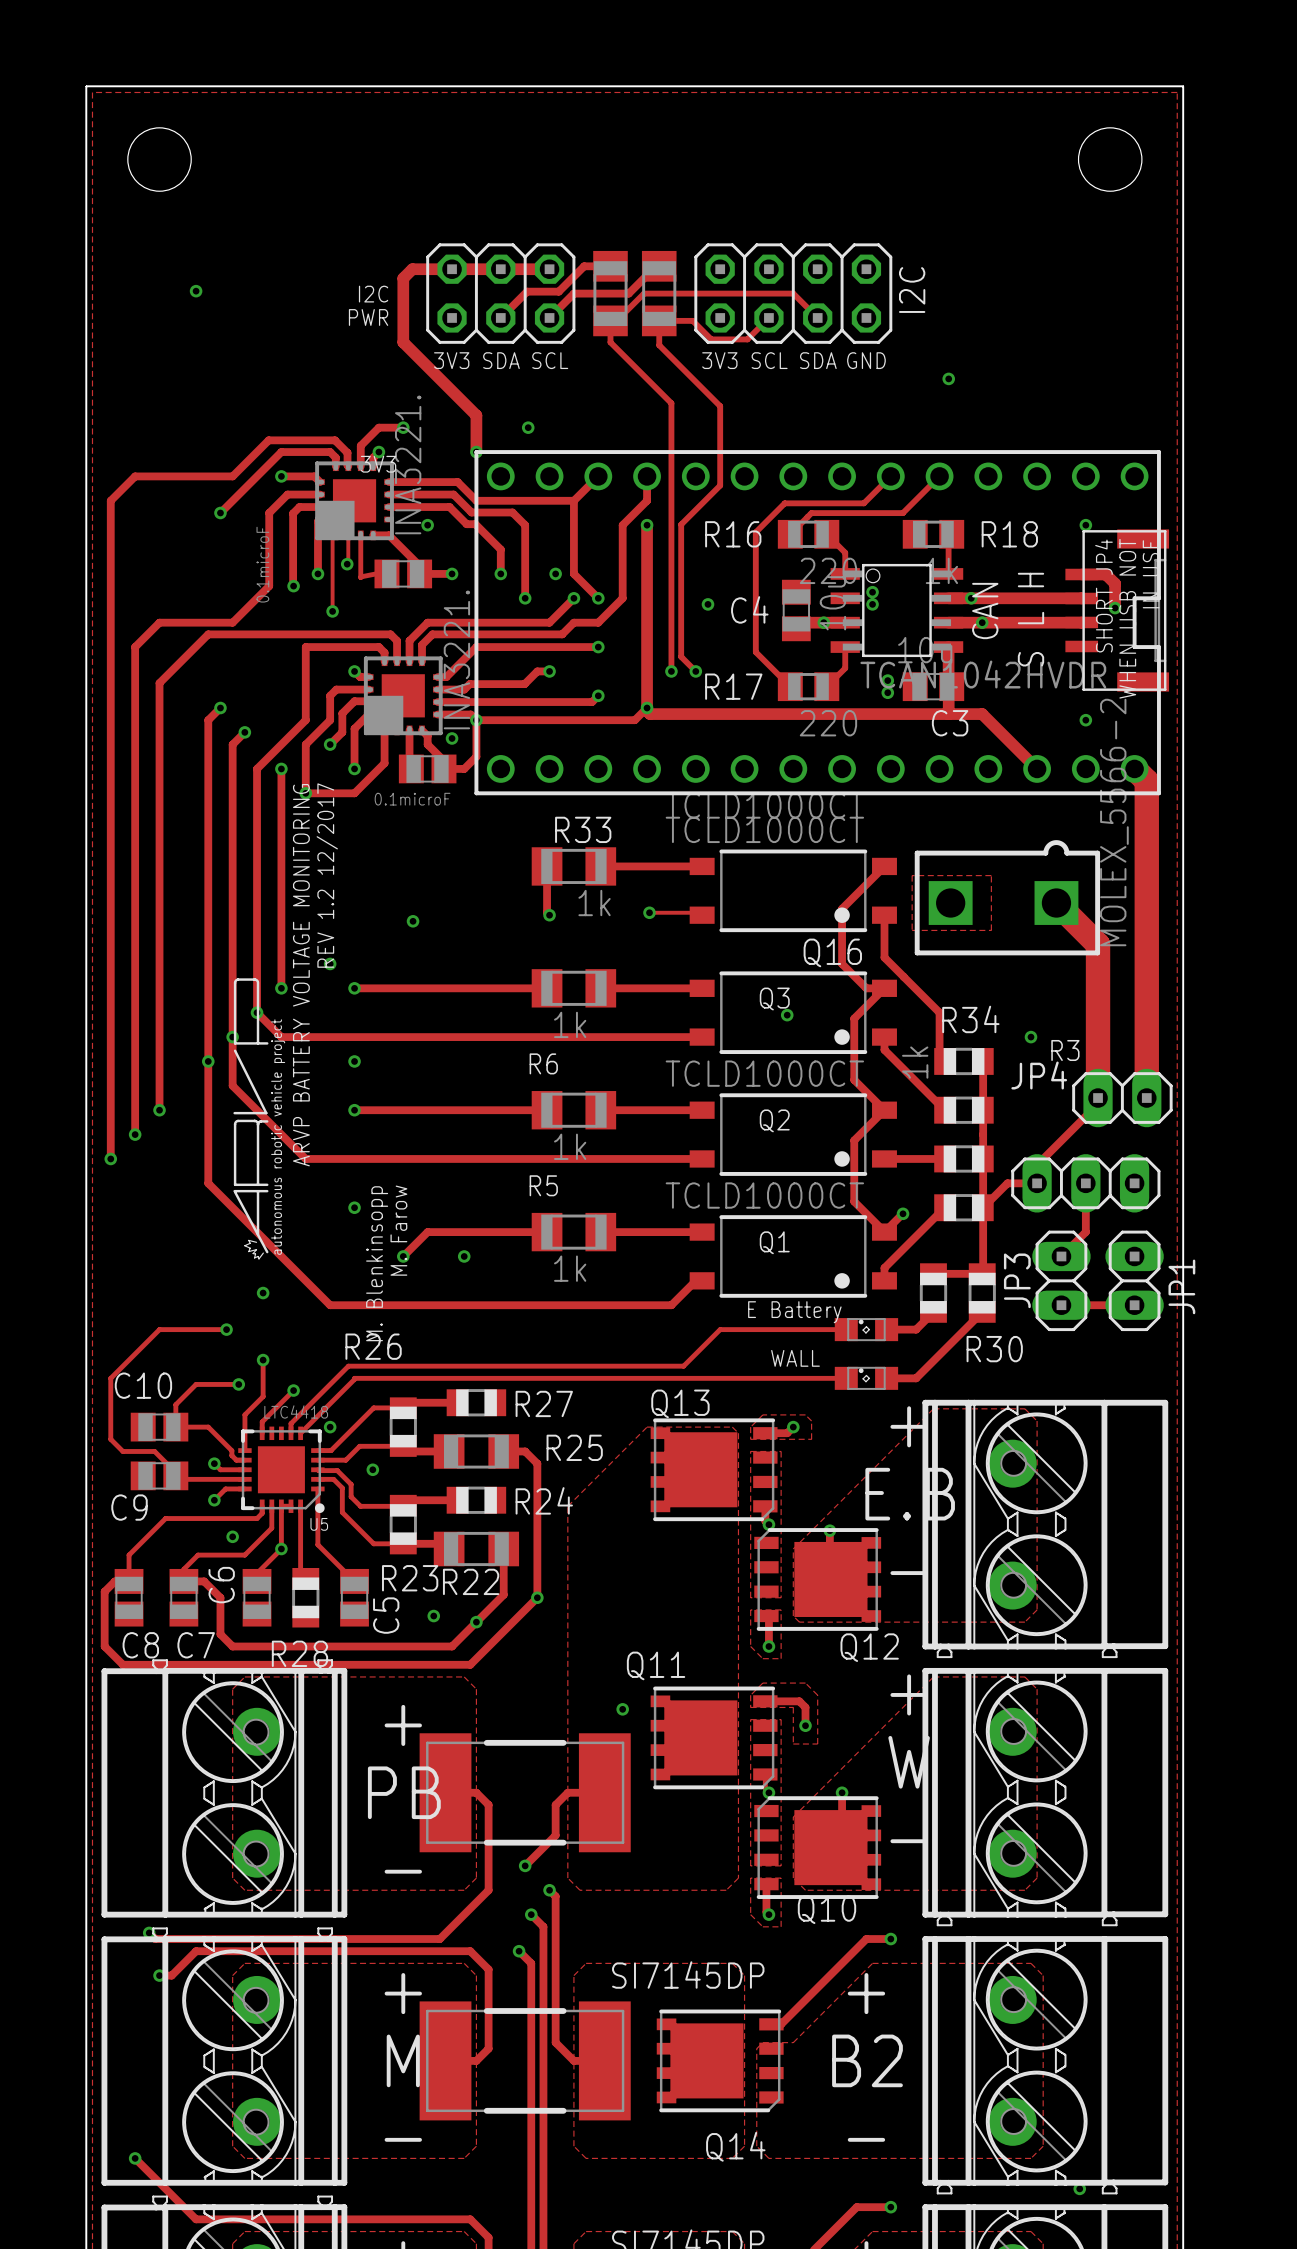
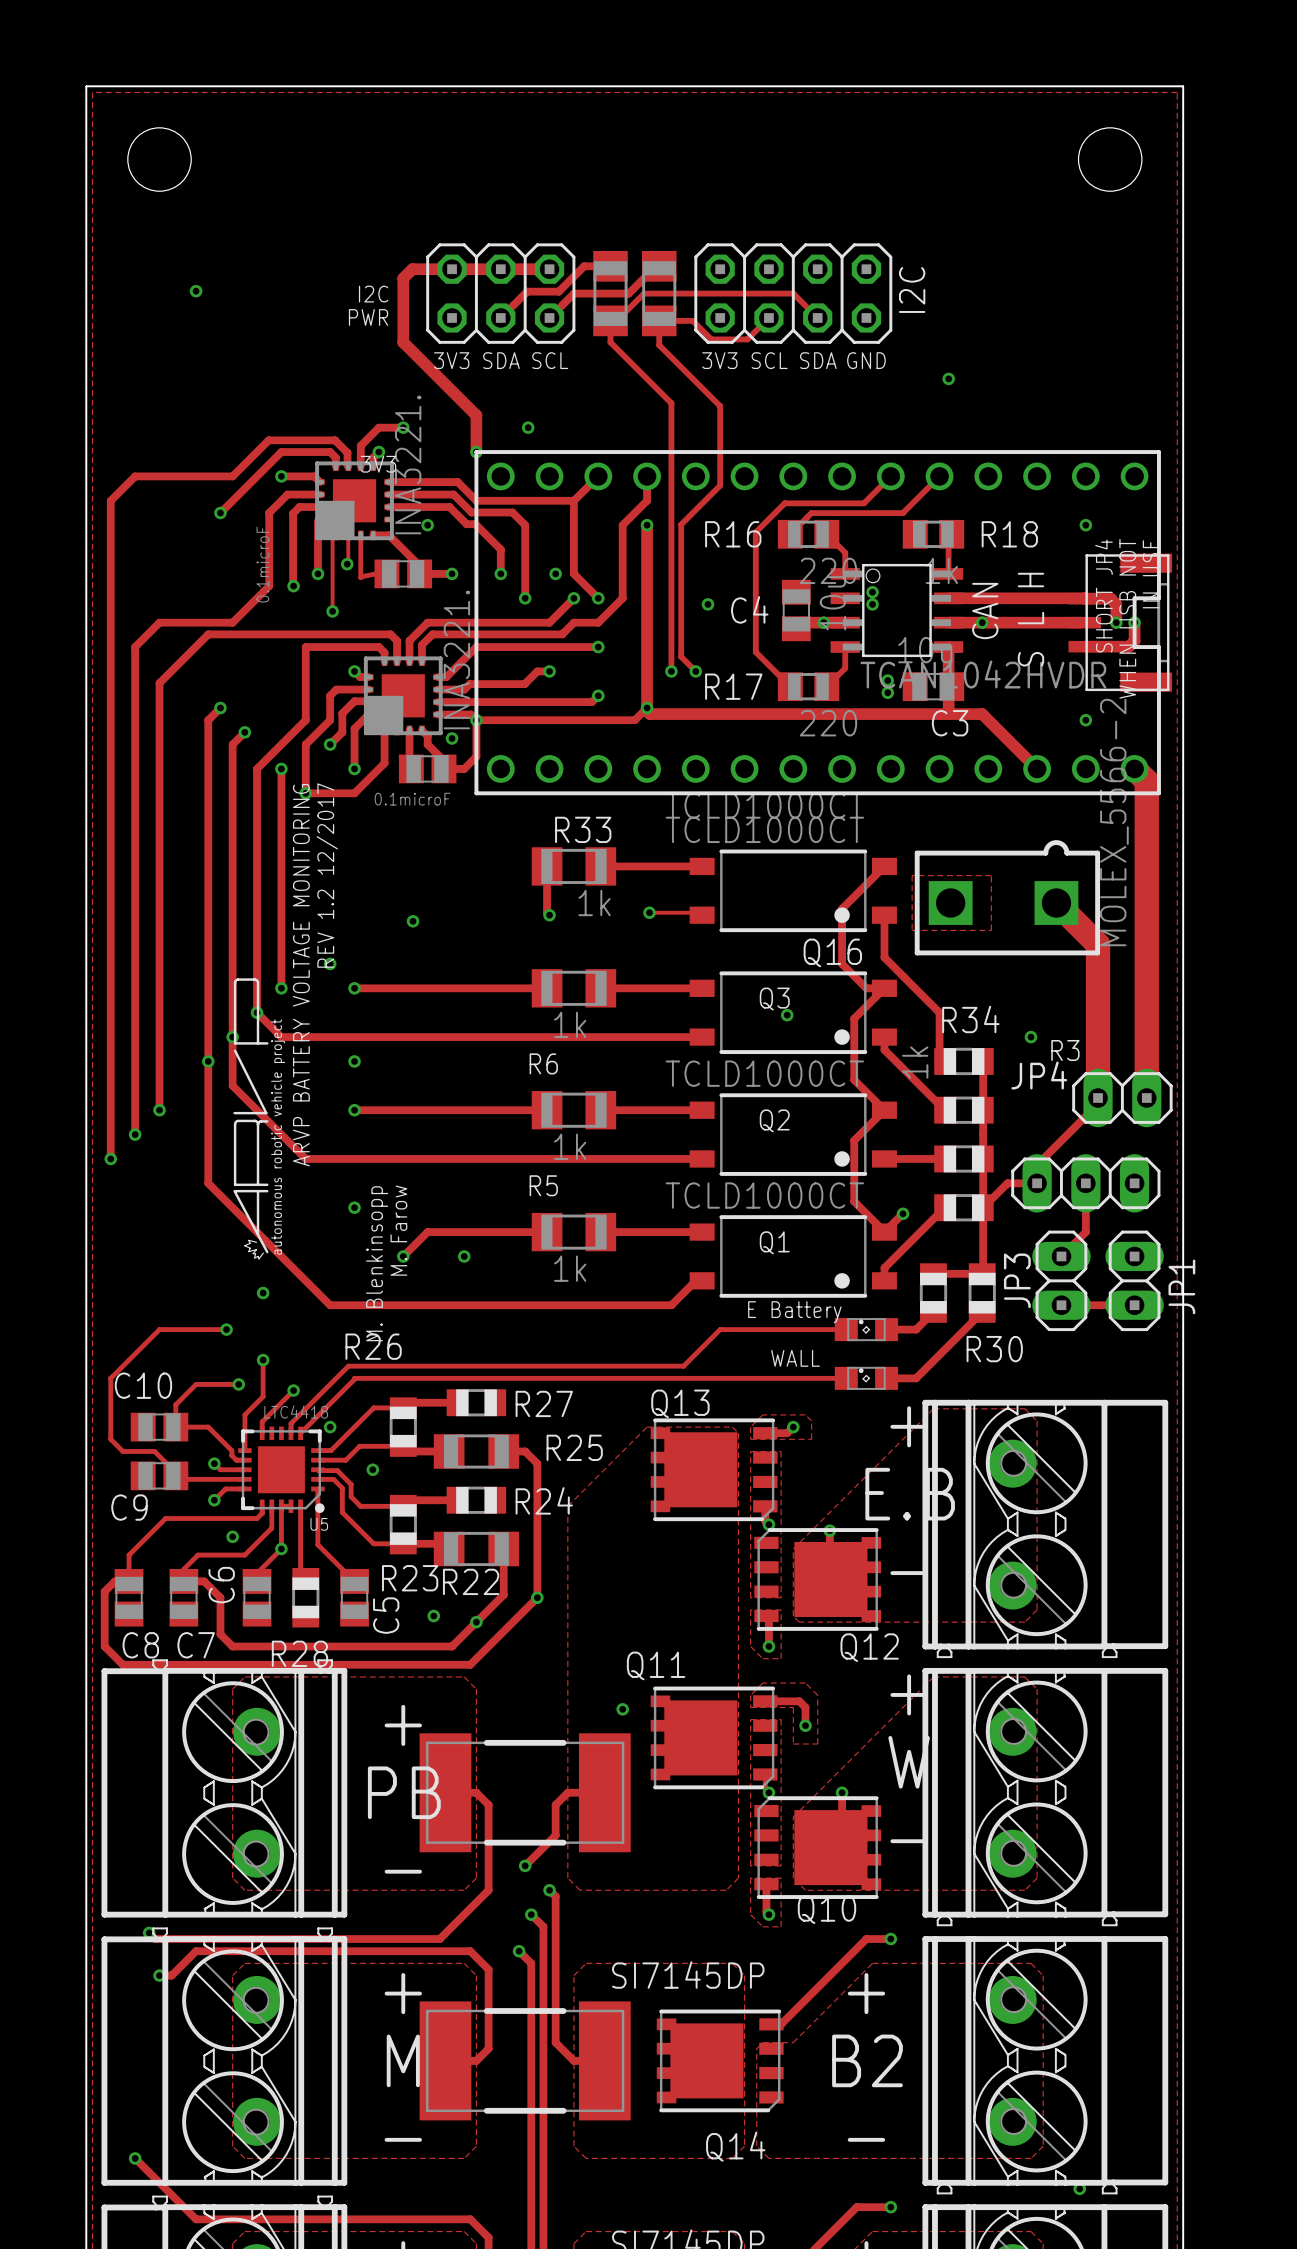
part footprint: [1065, 529, 1170, 692] -> [1068, 553, 1173, 692]
track: (1081, 574) (1105, 574) (1115, 583) (1115, 608) -> none
via: (971, 598) -> none
track: none -> (1081, 598) (1110, 598) (1116, 604) (1116, 622)
via: (1115, 608) -> none
via: none -> (1116, 622)
track: none -> (1134, 622) (1134, 640) (1128, 646) (1084, 646)
via: none -> (1134, 622)

